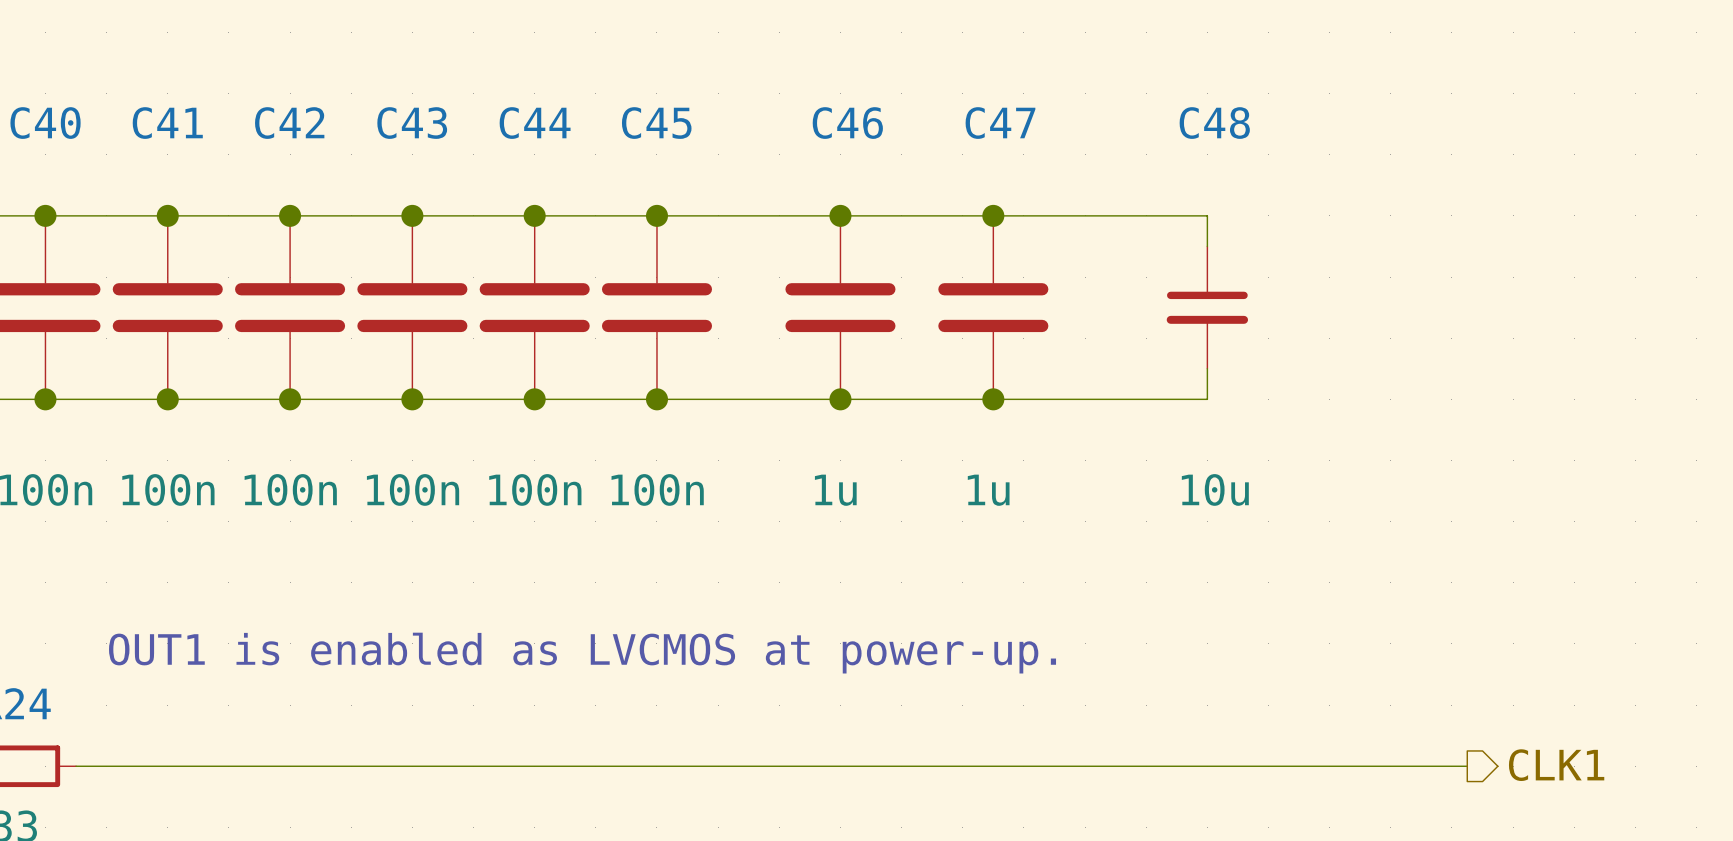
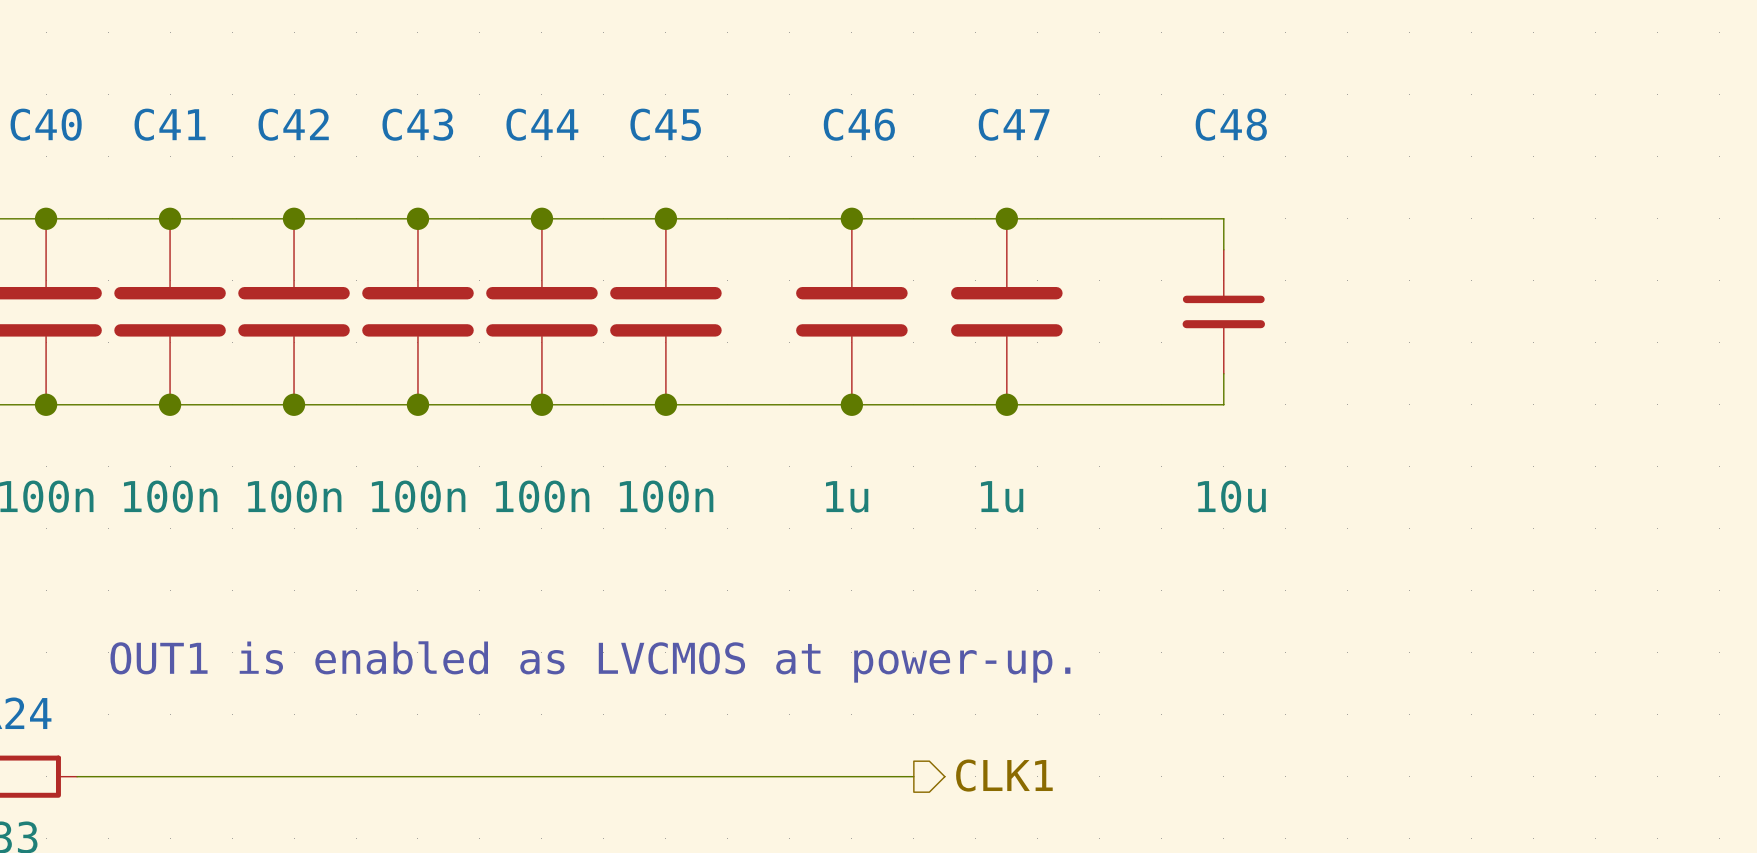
hierarchical label position: CLK1 (1556, 765) -> CLK1 (1004, 775)
wire: (901, 766) (1467, 766) -> none

